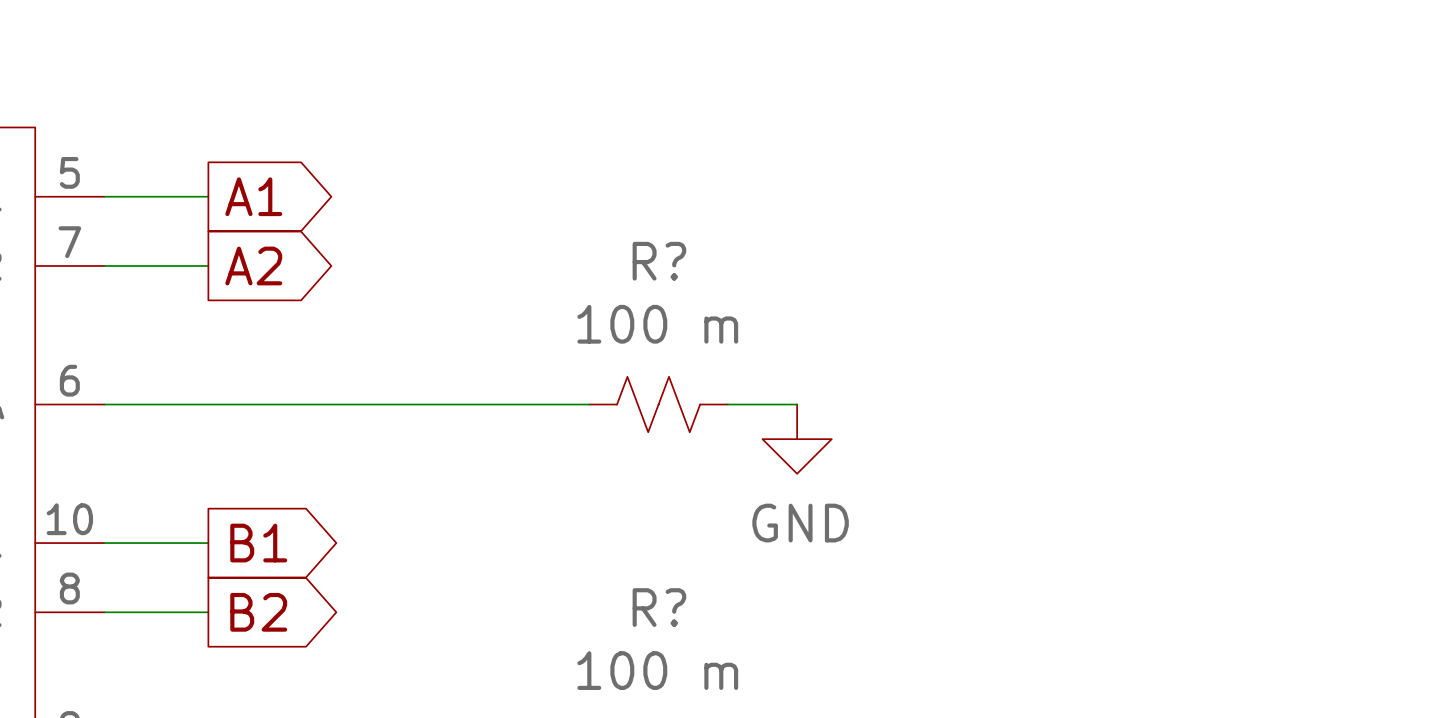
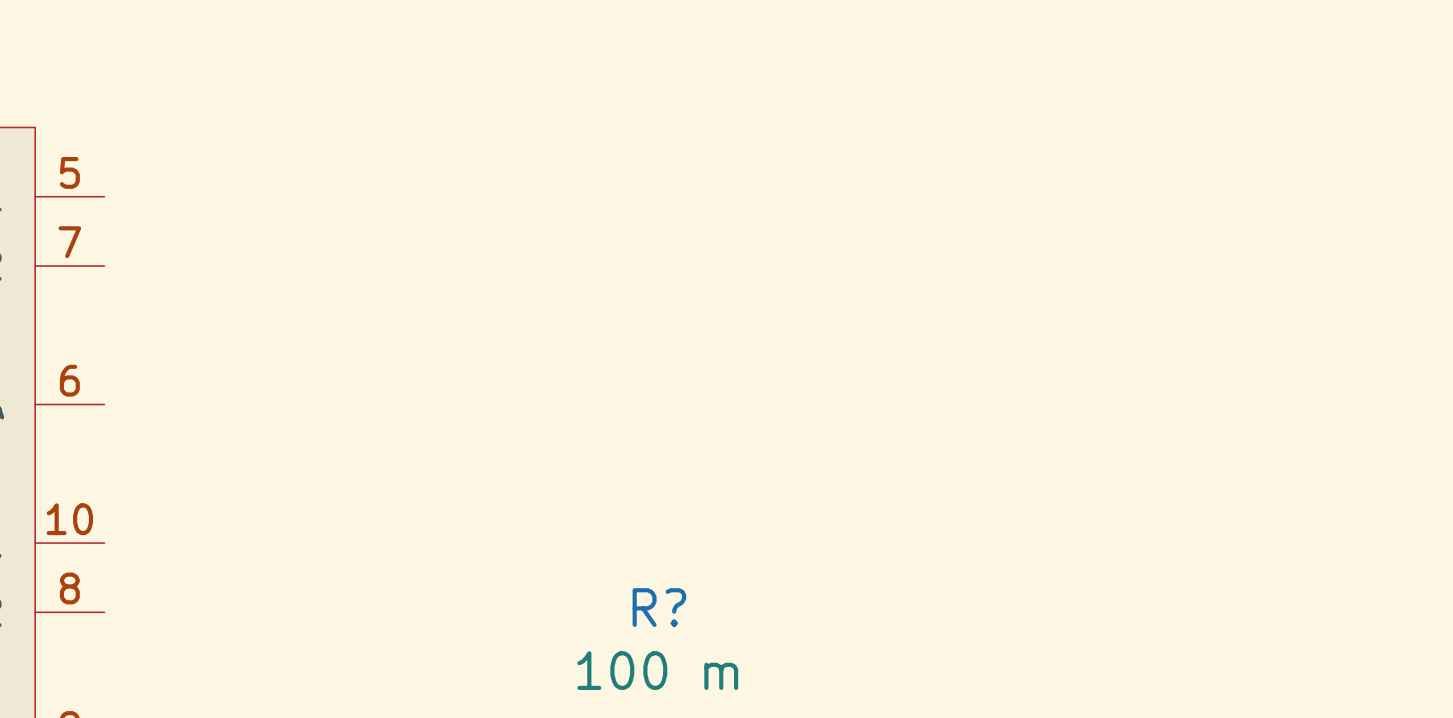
wire: (104, 196) (208, 196) -> none
global label: A1 (253, 196) -> none
wire: (104, 265) (208, 265) -> none
global label: A2 (253, 265) -> none
wire: (104, 404) (589, 404) -> none
R?: 100 m (658, 404) -> none
wire: (727, 404) (797, 404) -> none
power symbol: GND (797, 439) -> none
wire: (104, 543) (208, 543) -> none
global label: B1 (258, 543) -> none
wire: (104, 612) (208, 612) -> none
global label: B2 (258, 612) -> none

